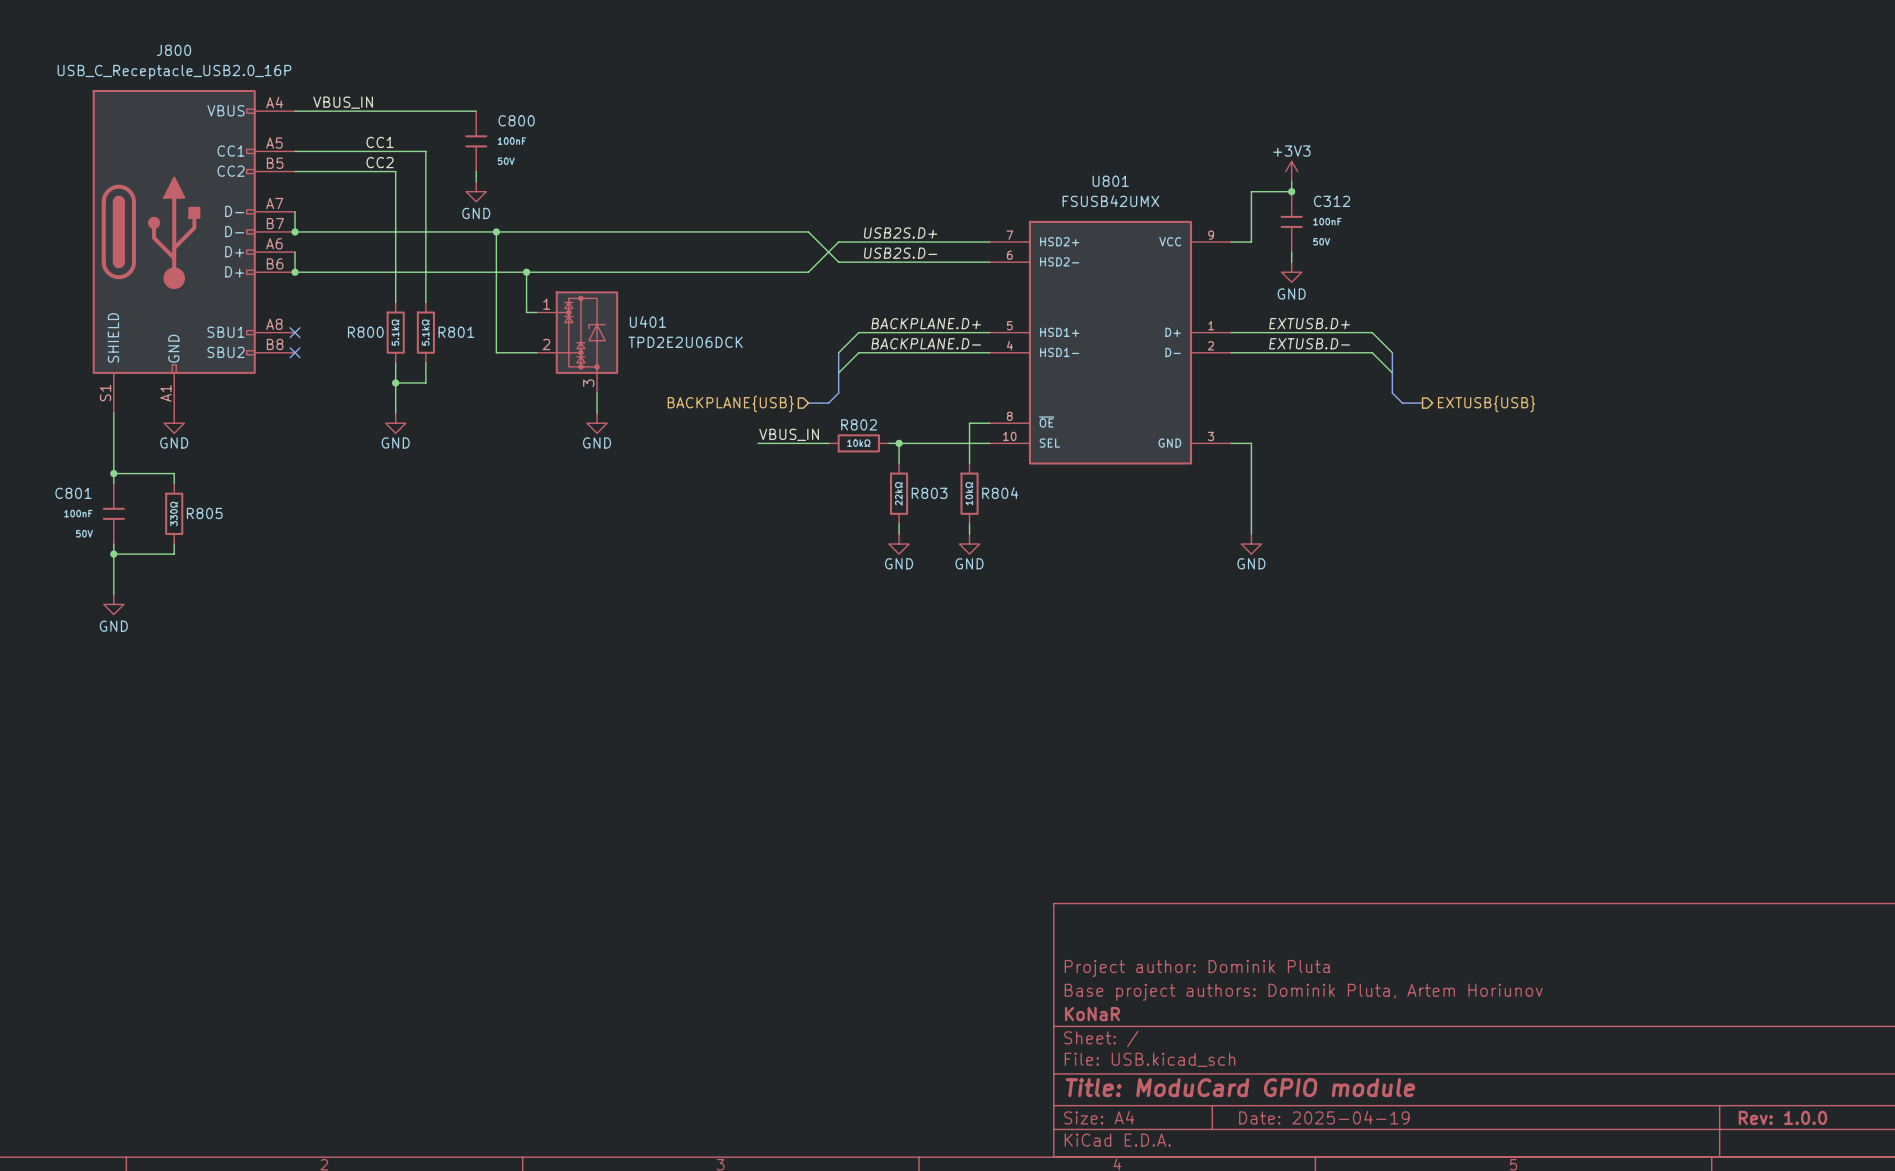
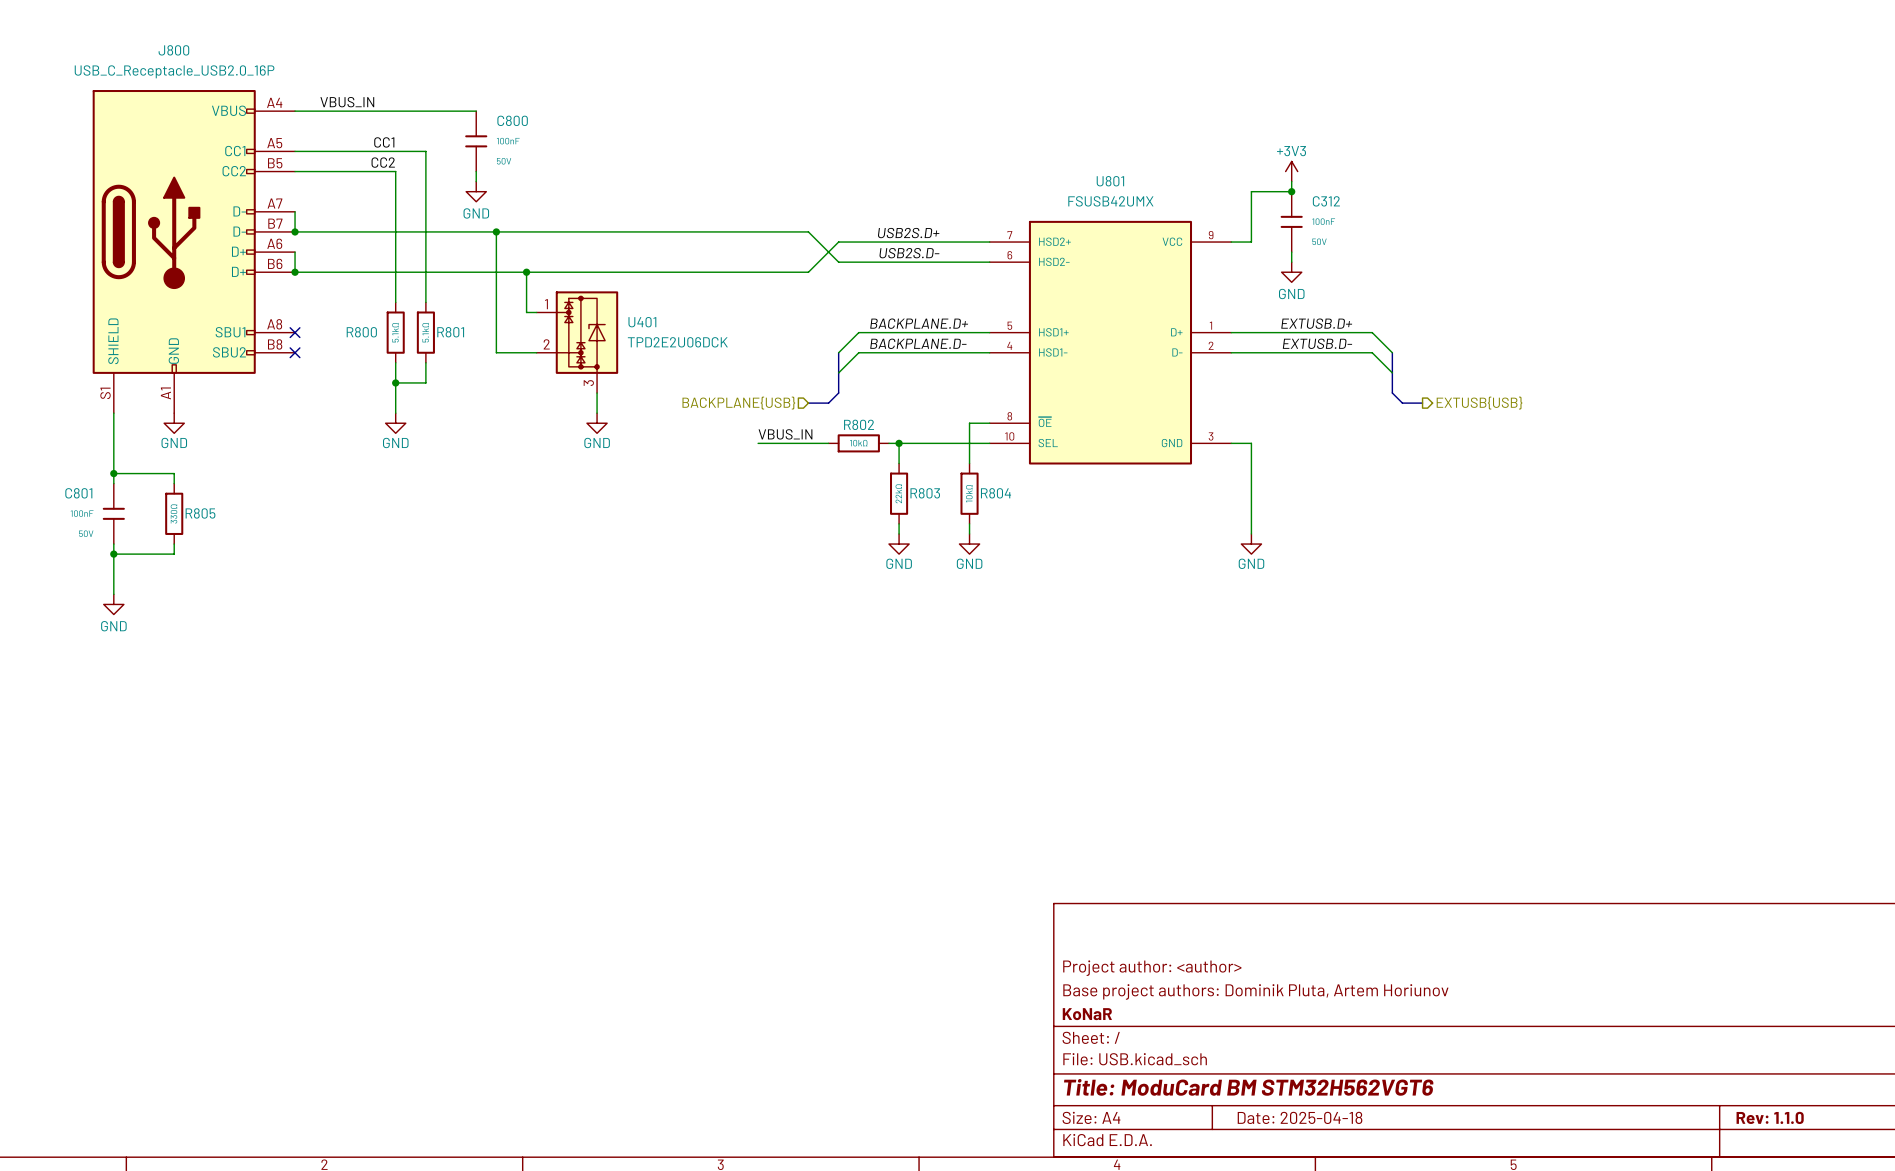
title block: Project author: Dominik Pluta (1197, 968) -> Project author: <author> (1152, 968)
title block: Title: ModuCard GPIO module (1240, 1087) -> Title: ModuCard BM STM32H562VGT6 (1248, 1087)
title block: Date: 2025-04-19 (1324, 1117) -> Date: 2025-04-18 (1300, 1117)
title block: Rev: 1.0.0 (1782, 1117) -> Rev: 1.1.0 (1770, 1117)

